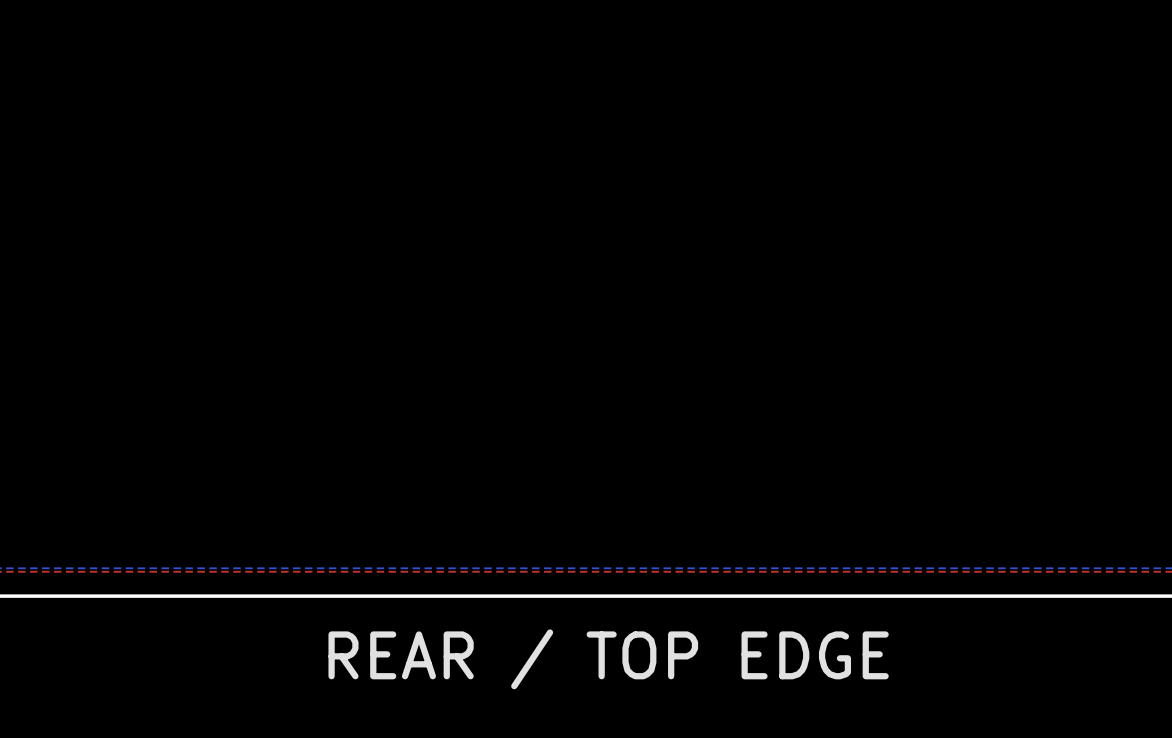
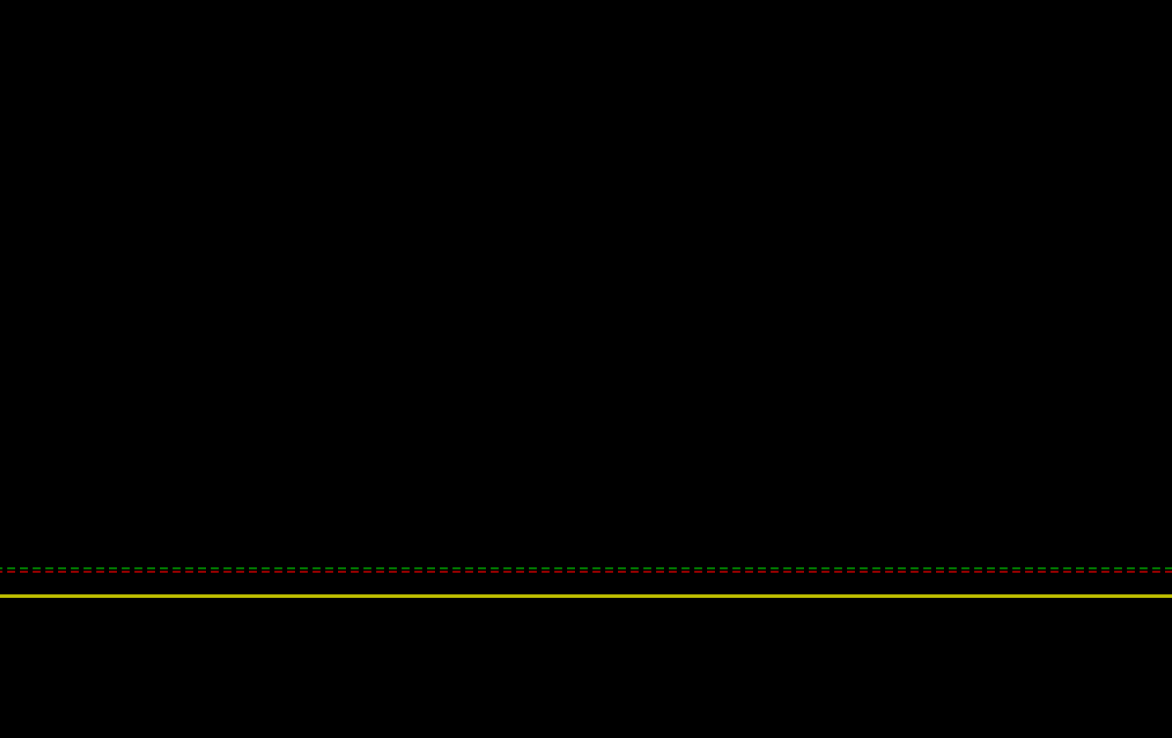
text: REAR / TOP EDGE (608, 659) -> none

